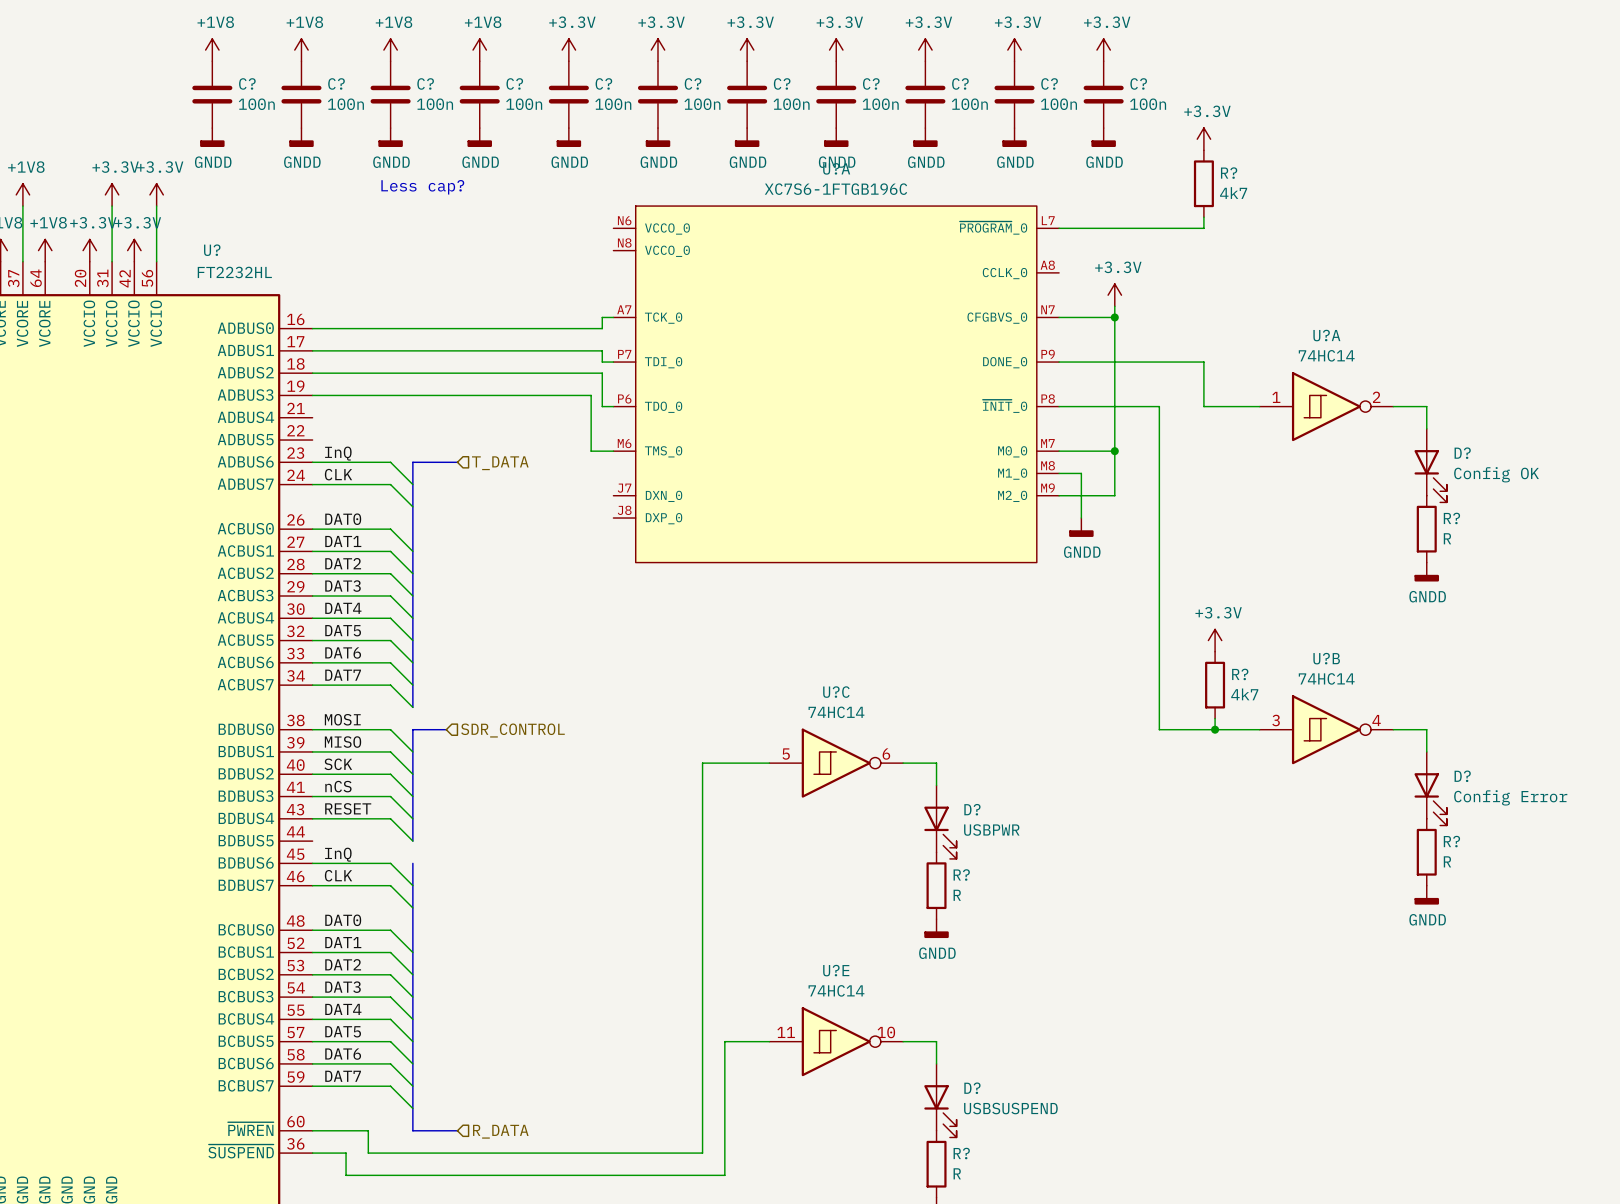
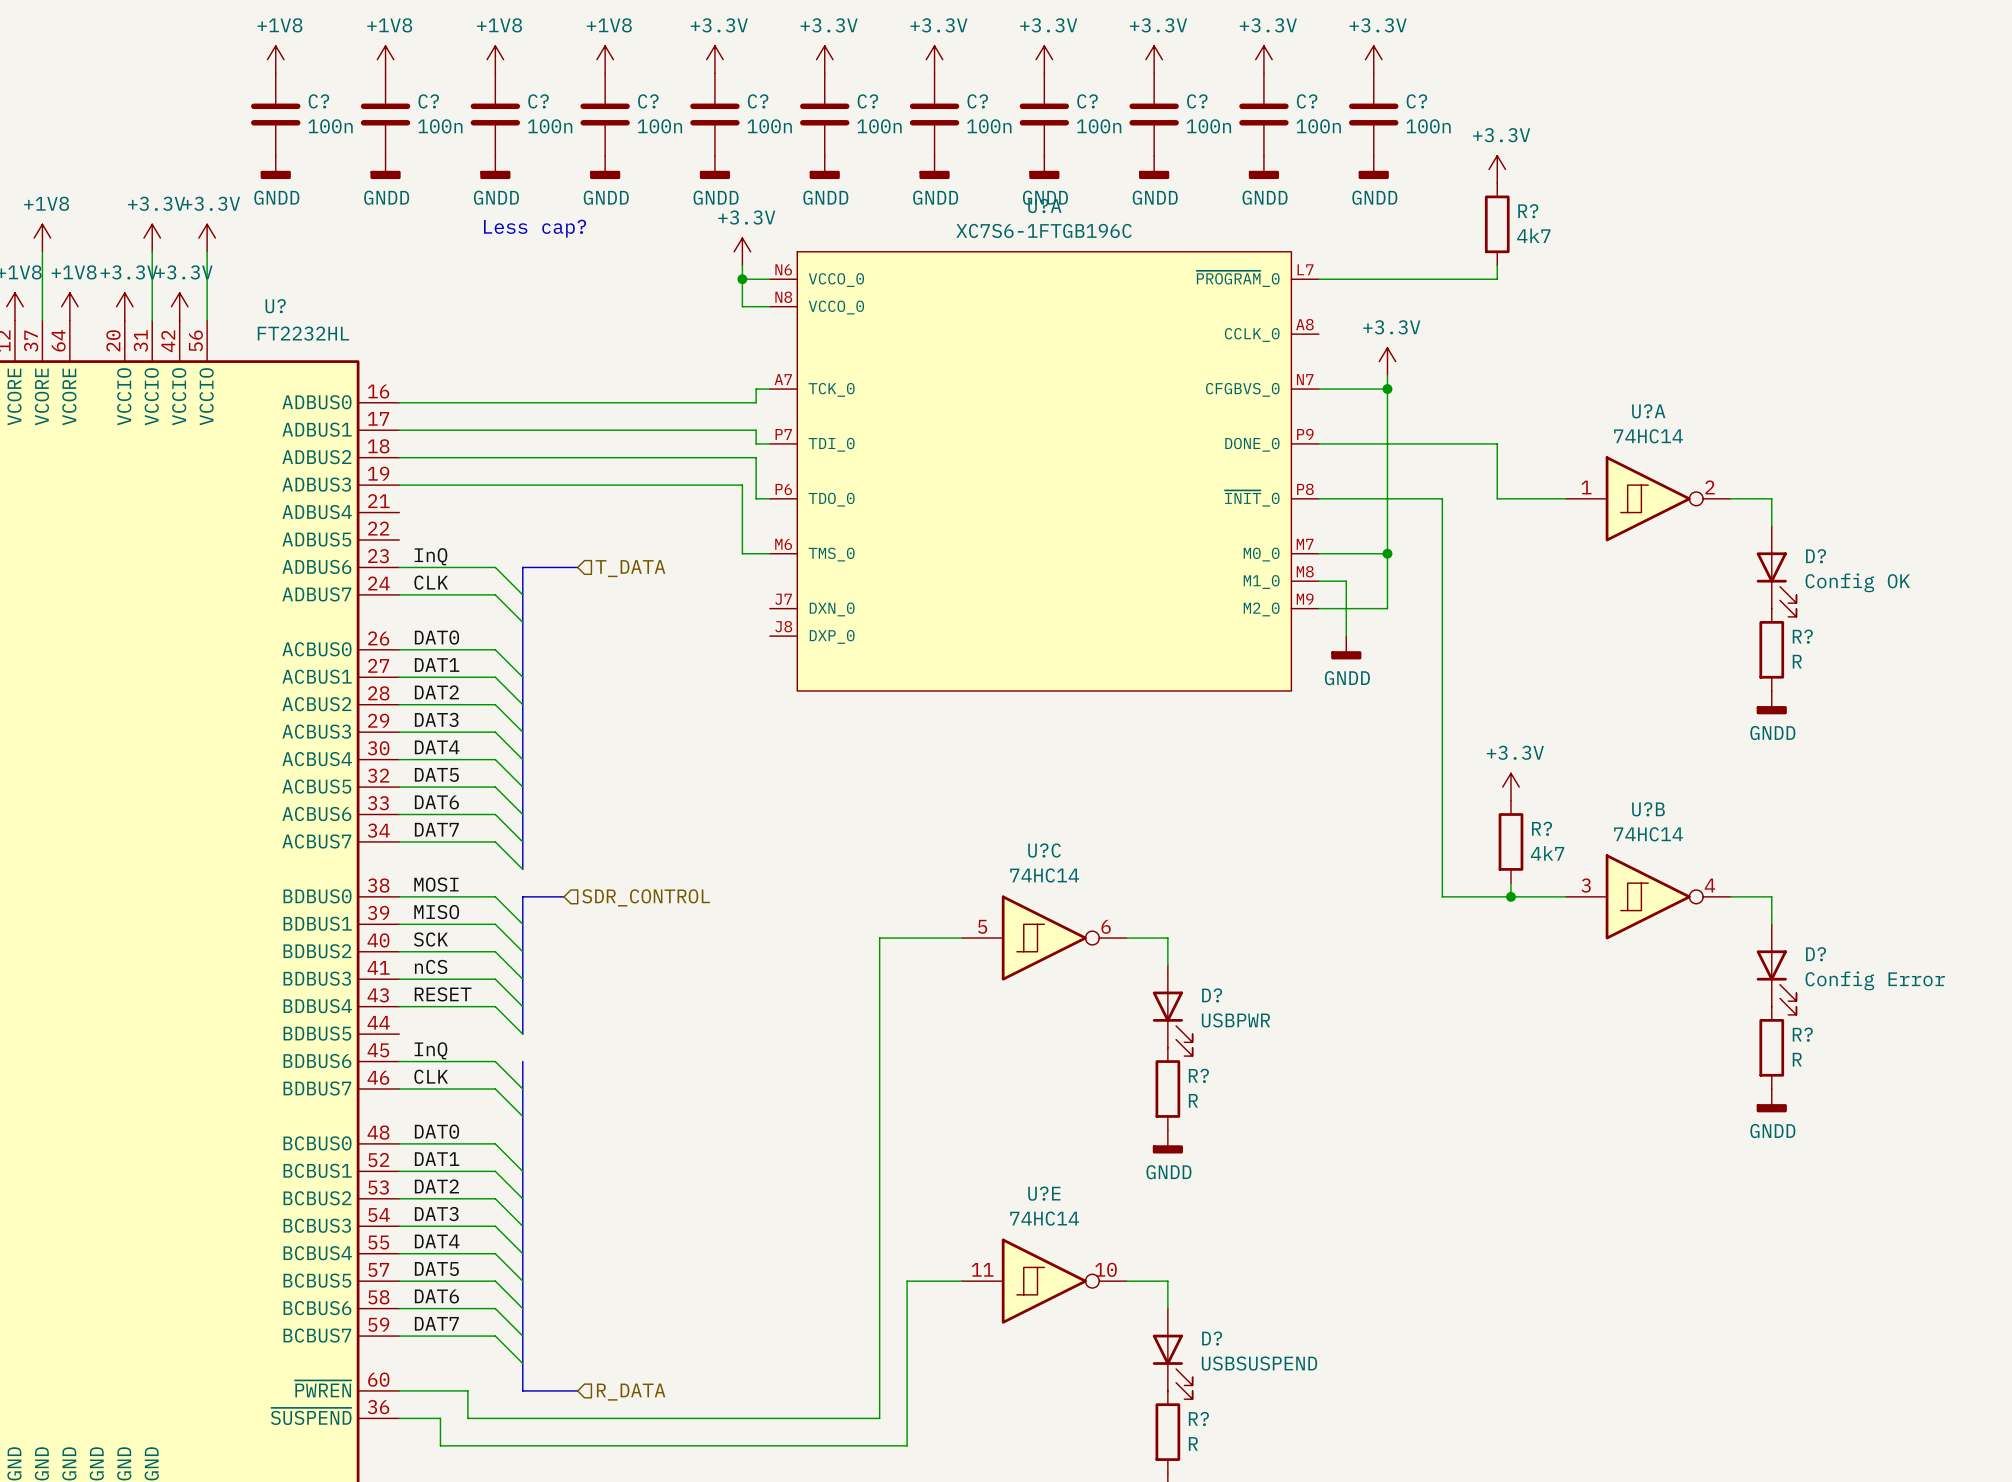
power symbol: none -> +3.3V (742, 251)
wire: none -> (742, 265) (742, 306) (769, 306)
wire: none -> (742, 279) (769, 279)
junction: none -> (742, 279)

